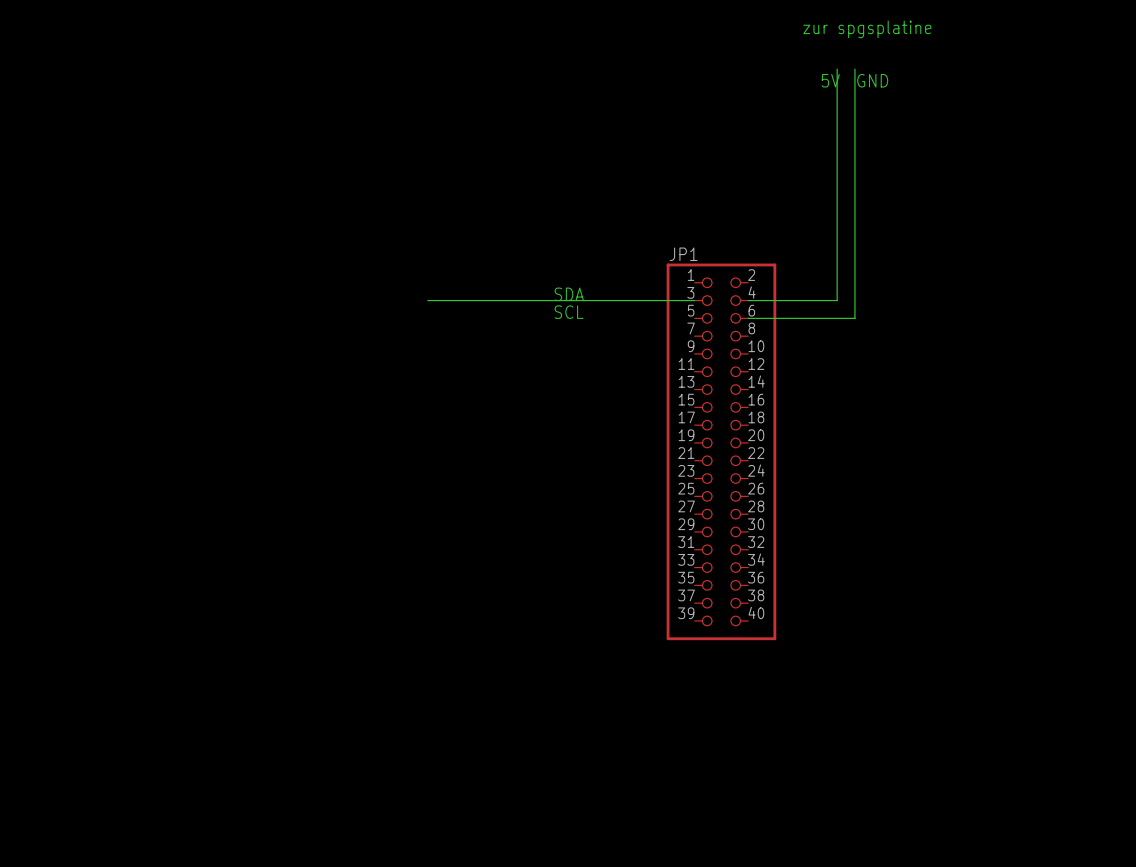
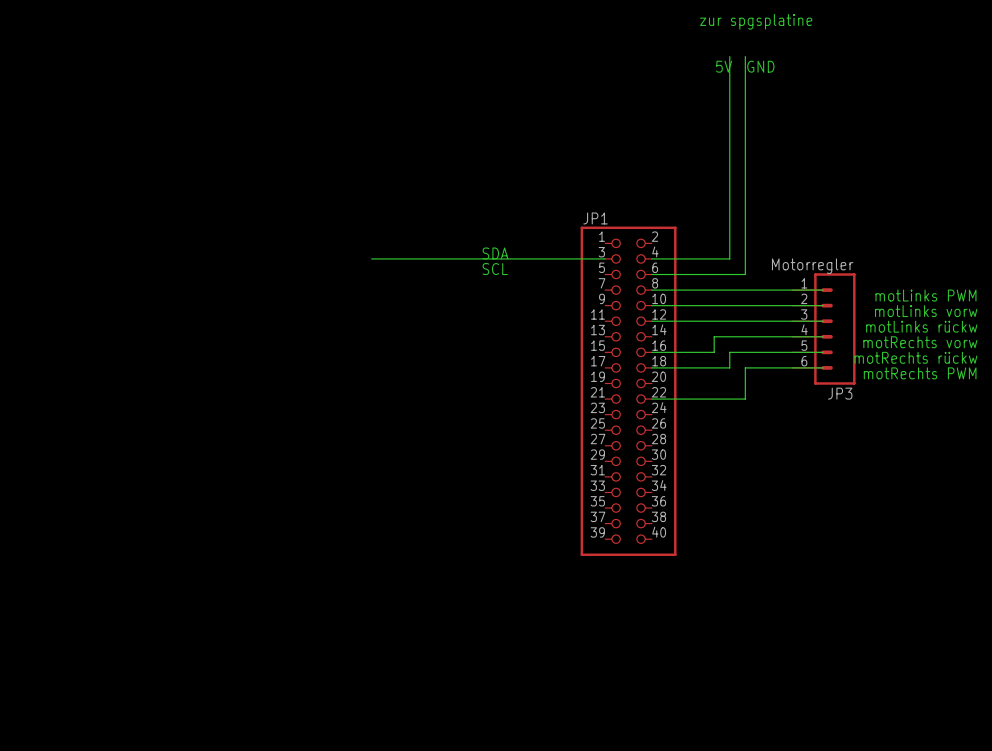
wire: none -> (651, 290) (823, 290)
text: none -> motLinks PWM (925, 295)
wire: none -> (651, 305) (823, 305)
text: none -> motLinks vorw (926, 311)
wire: none -> (651, 321) (823, 321)
text: none -> motLinks rückw (921, 326)
JP3: none -> Motorregler (823, 329)
wire: none -> (823, 336) (714, 336) (714, 352) (651, 352)
text: none -> motRechts vorw (920, 342)
wire: none -> (823, 352) (729, 352) (729, 367) (651, 367)
text: none -> motRechts rückw (915, 357)
wire: none -> (823, 367) (745, 367) (745, 399) (651, 399)
text: none -> motRechts PWM (920, 373)

